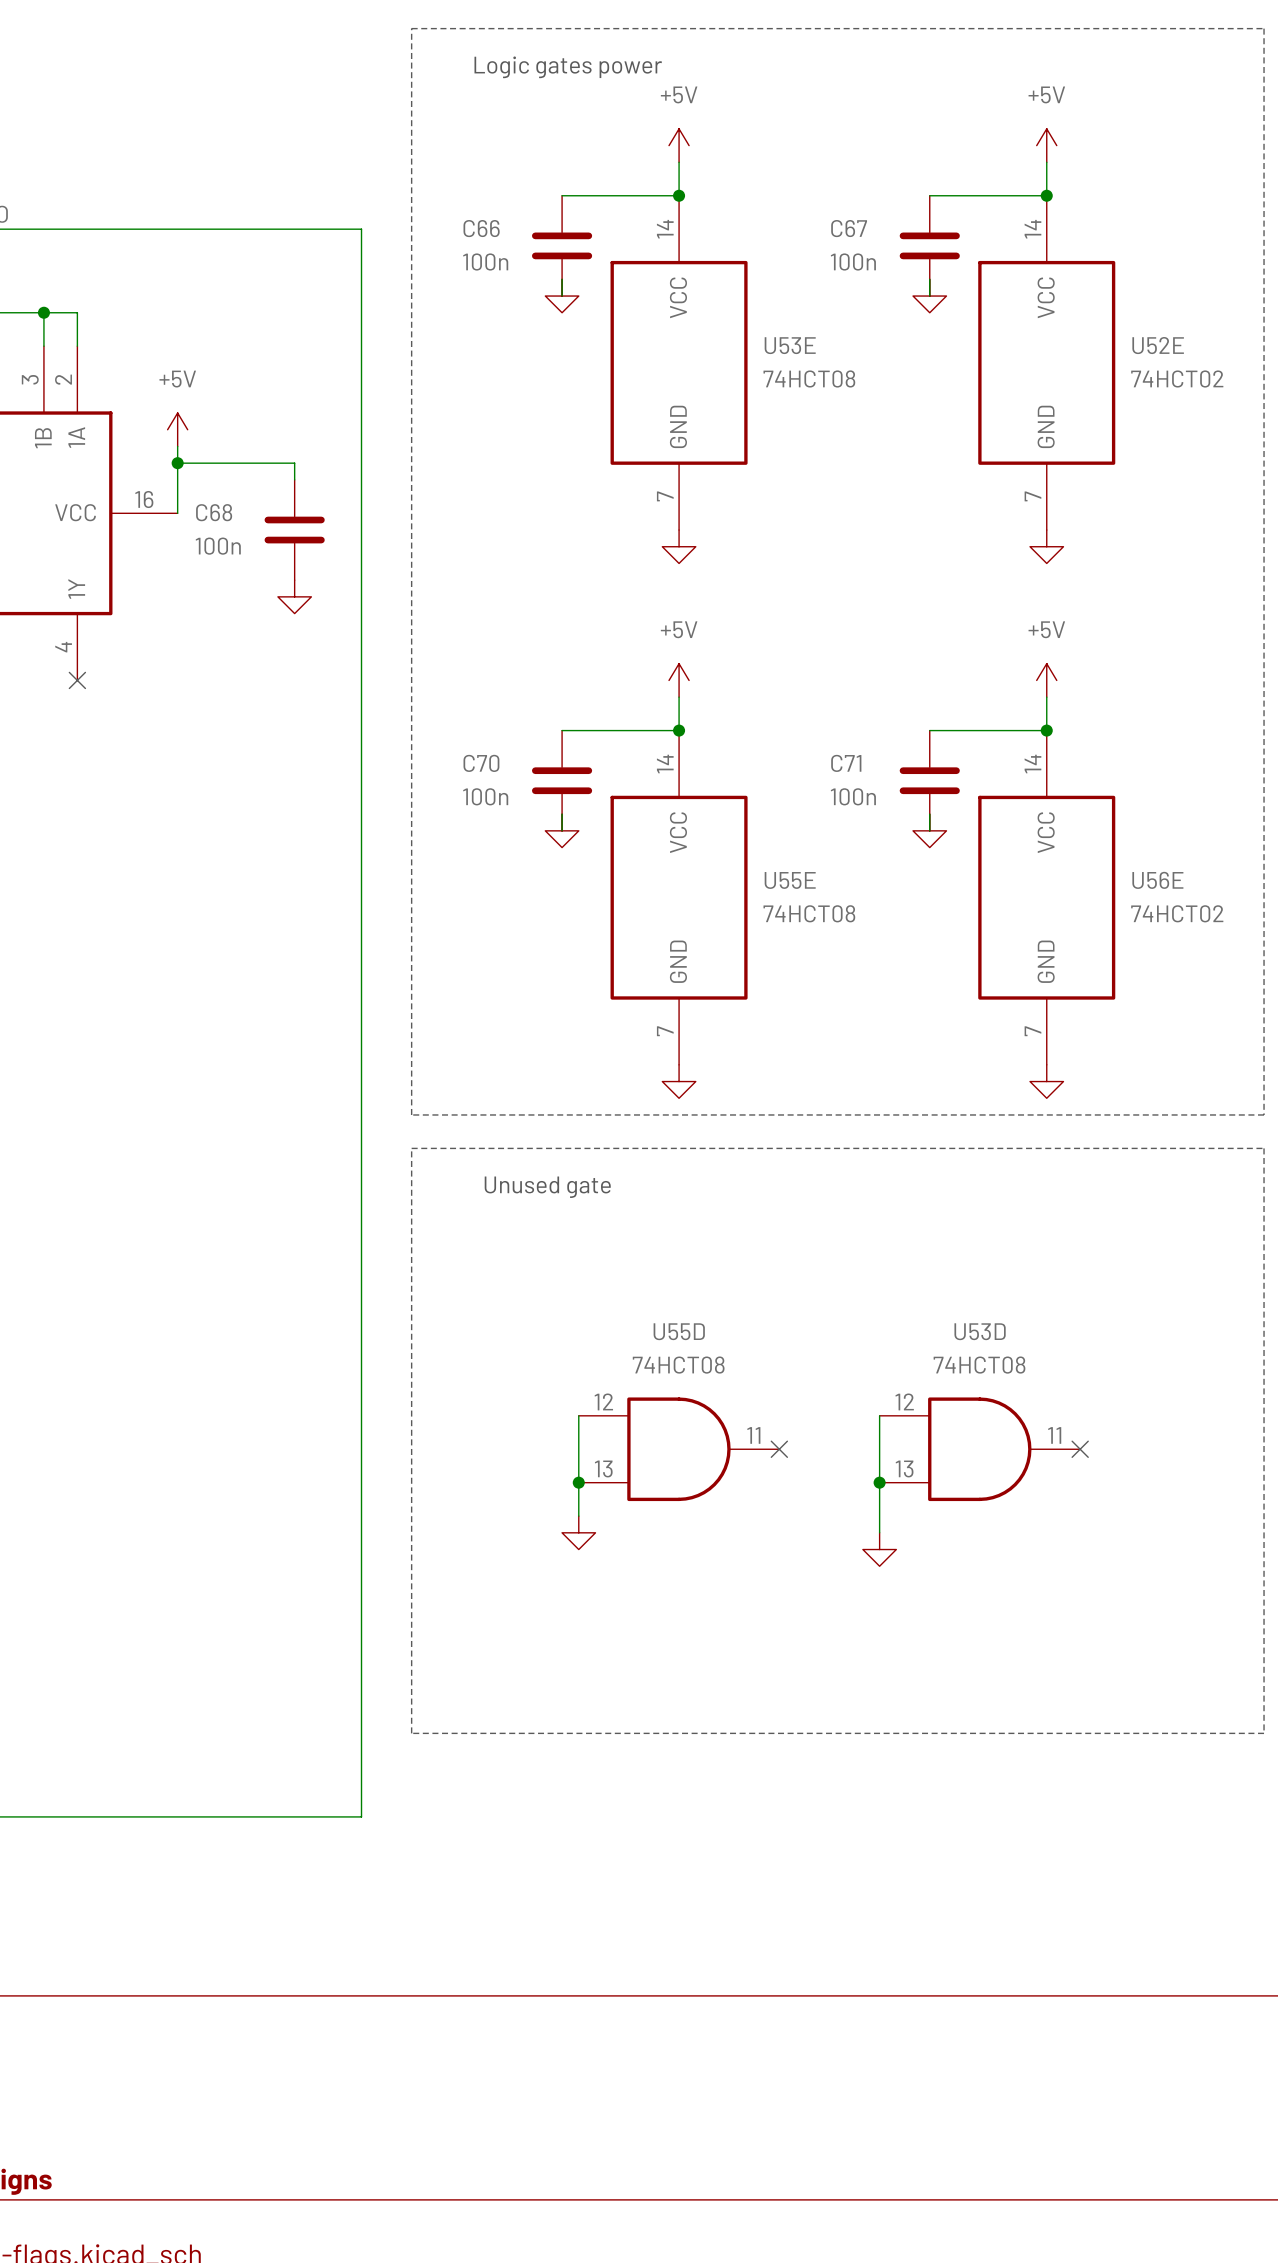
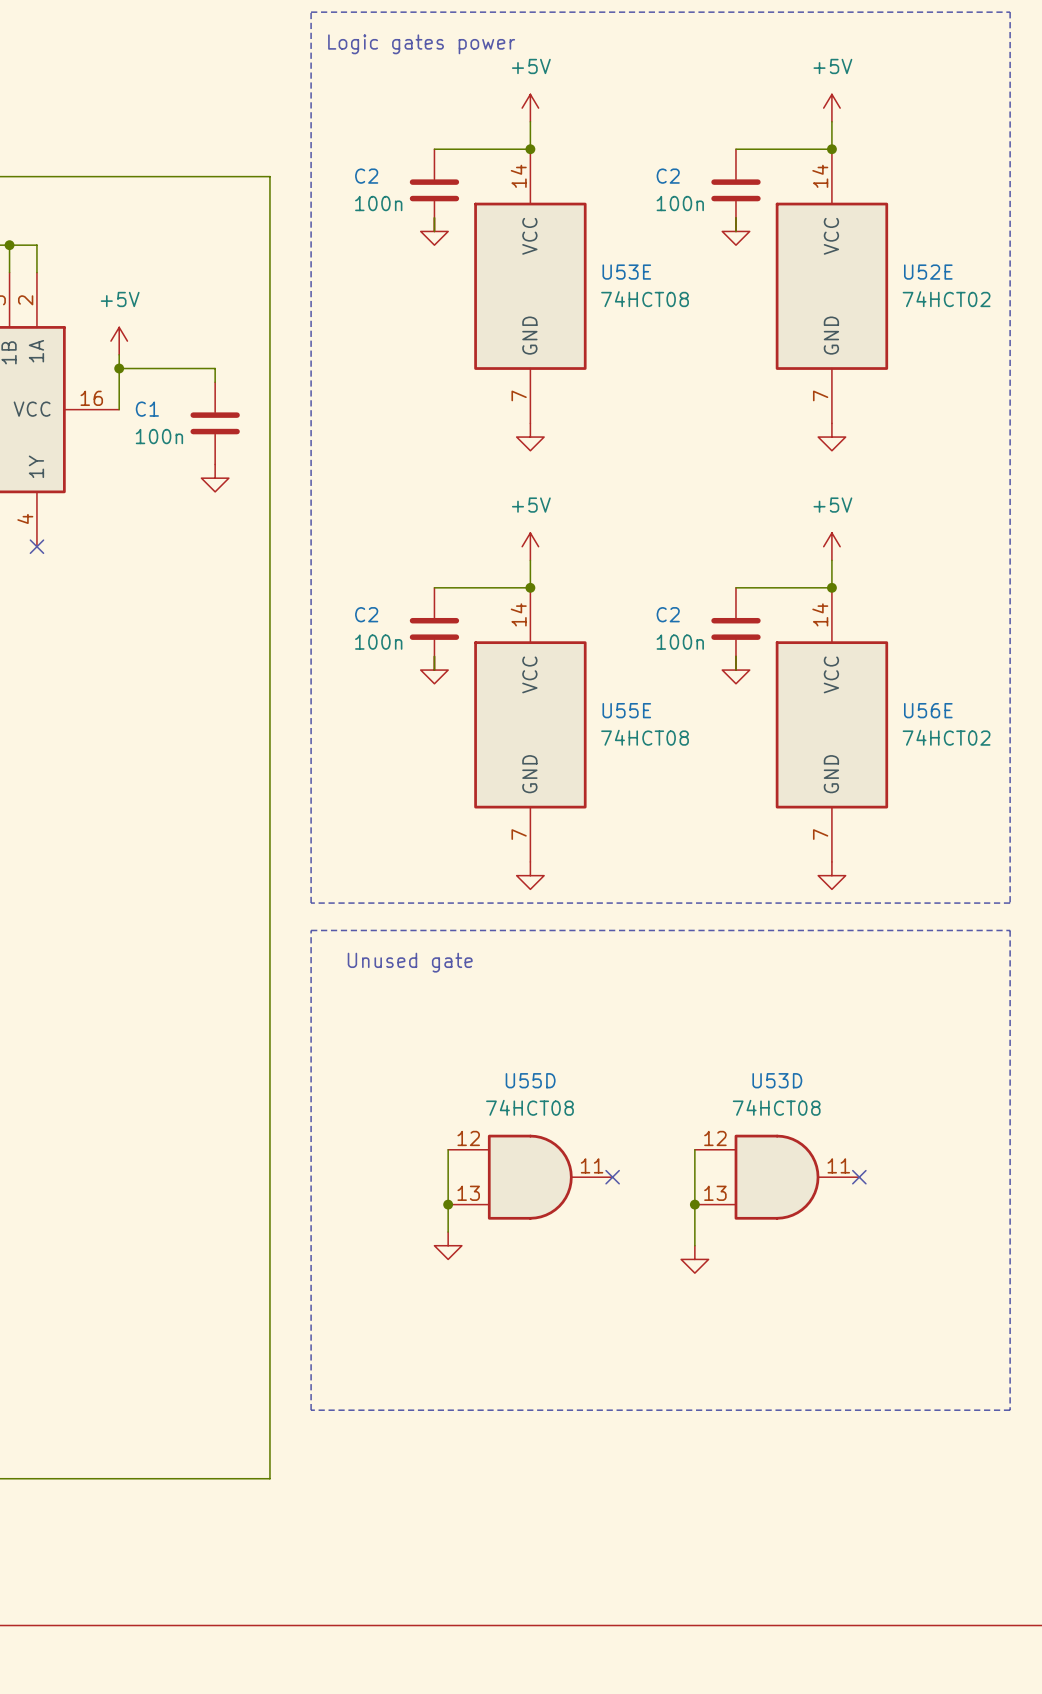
C66 name: C66 (481, 228) -> C2 (366, 176)
C67 name: C67 (849, 228) -> C2 (668, 176)
C68 name: C68 (214, 512) -> C1 (147, 409)
C70 name: C70 (481, 763) -> C2 (366, 614)
C71 name: C71 (846, 763) -> C2 (668, 614)

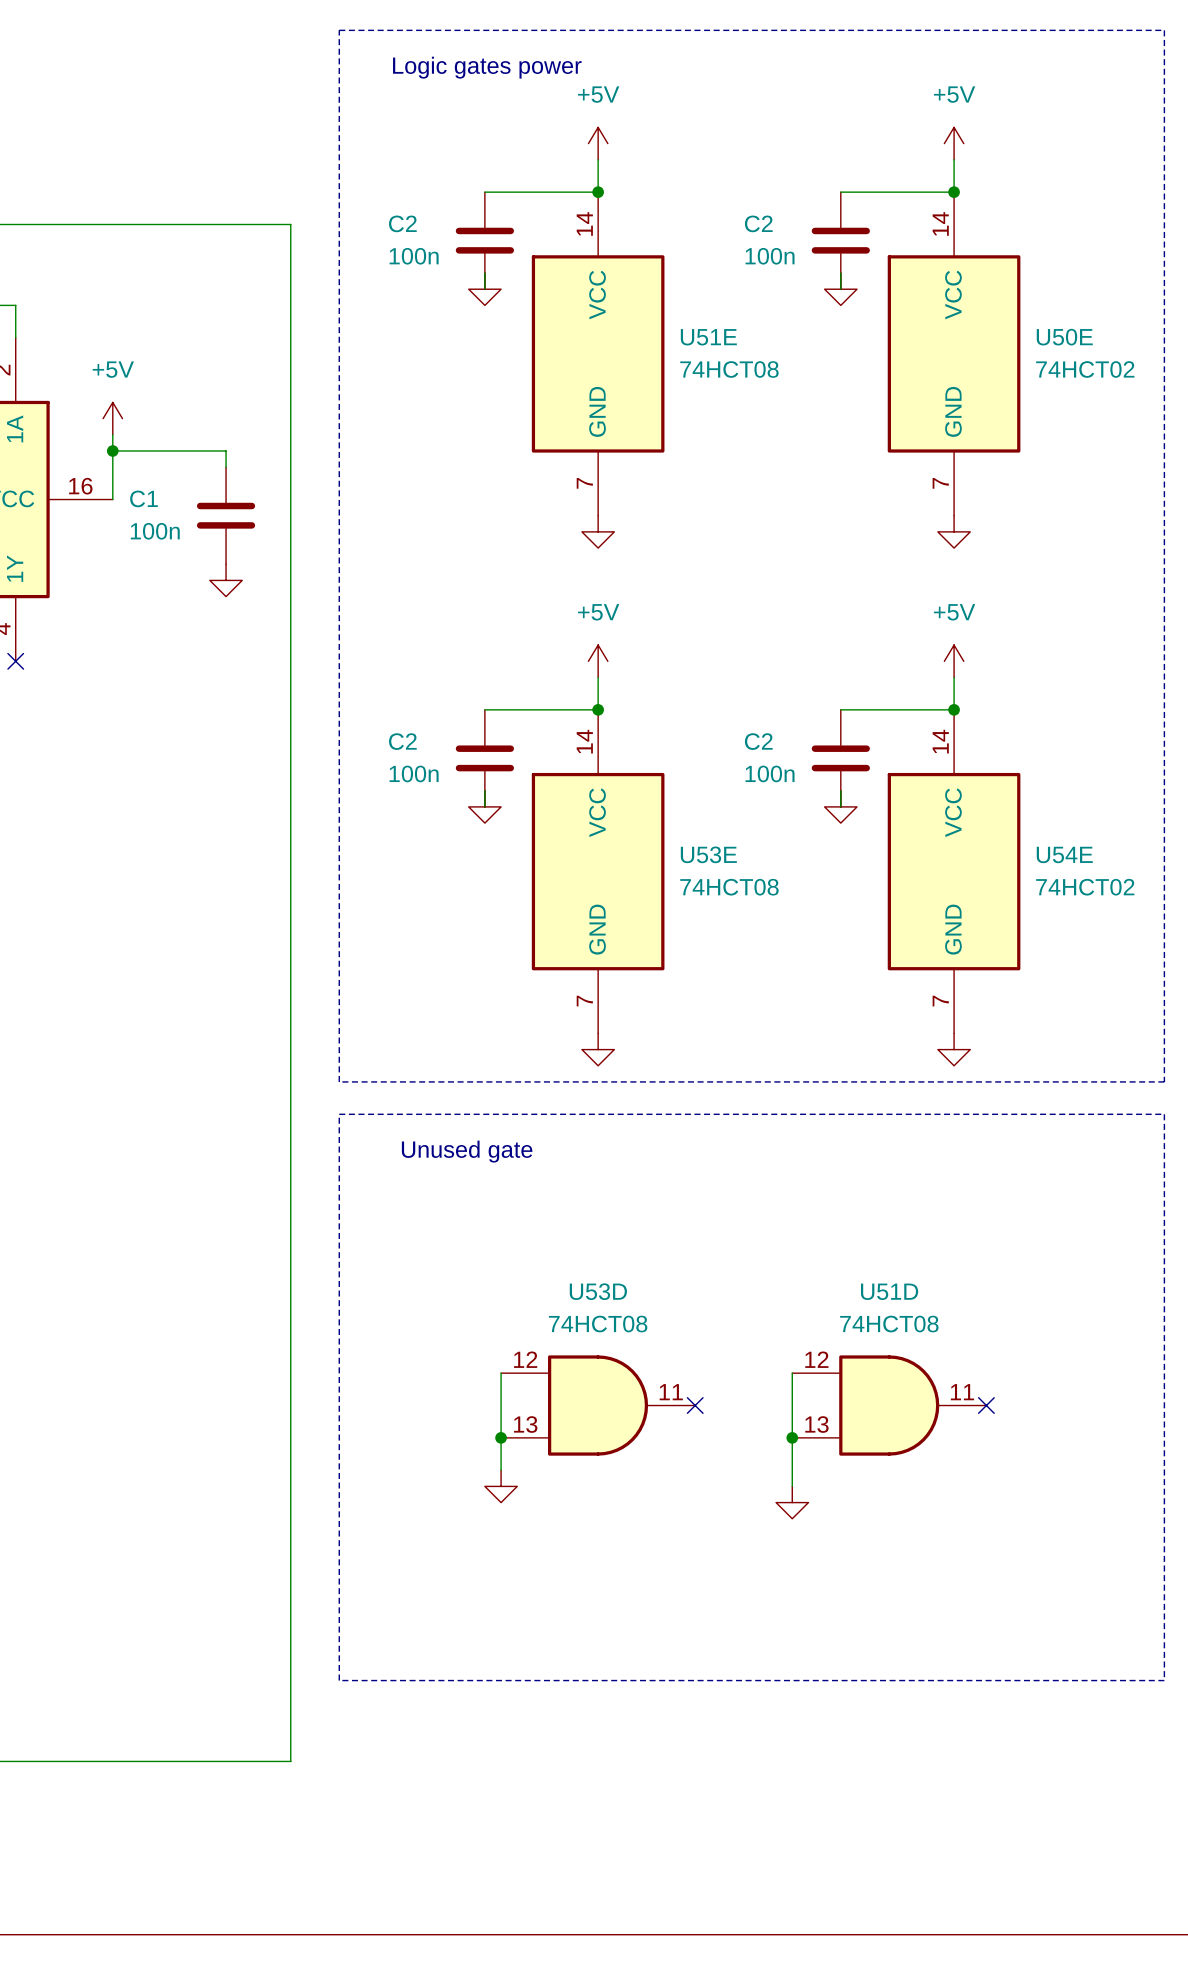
U53E name: U53E (626, 272) -> U51E (708, 337)
U52E name: U52E (928, 272) -> U50E (1064, 337)
U55E name: U55E (626, 710) -> U53E (708, 854)
U56E name: U56E (928, 710) -> U54E (1064, 854)
U55D name: U55D (530, 1080) -> U53D (598, 1291)
U53D name: U53D (777, 1080) -> U51D (889, 1291)

